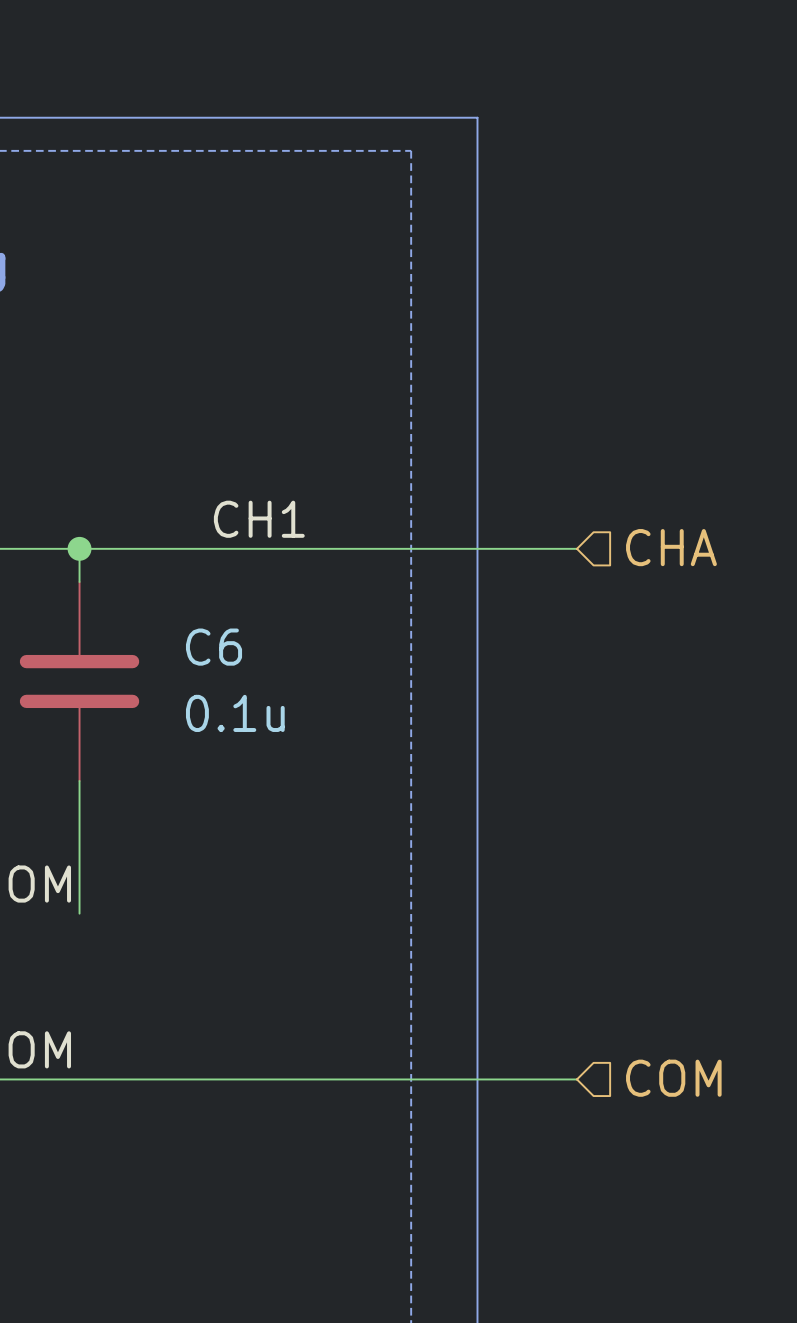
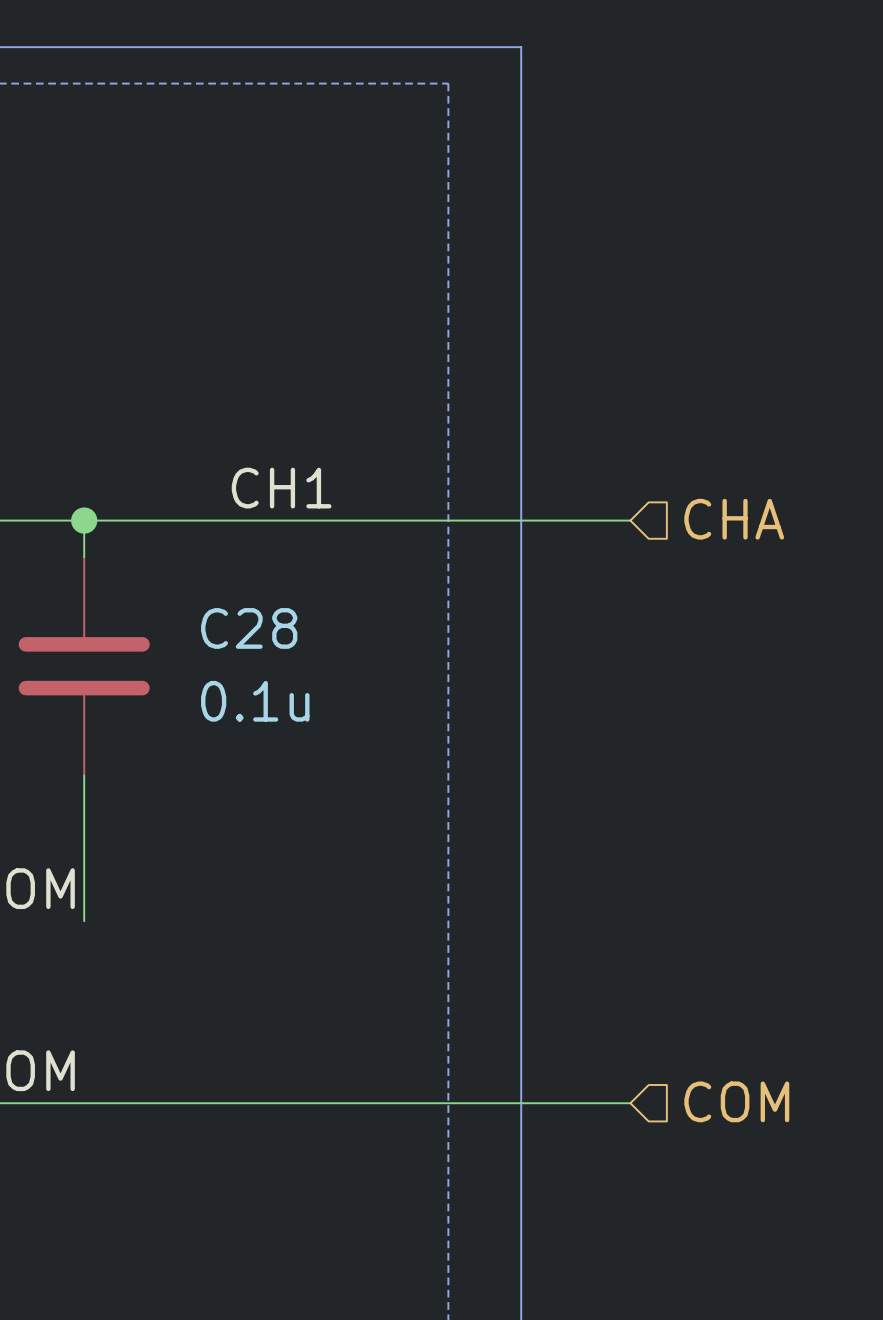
C6 name: C6 (214, 647) -> C28 (249, 628)

